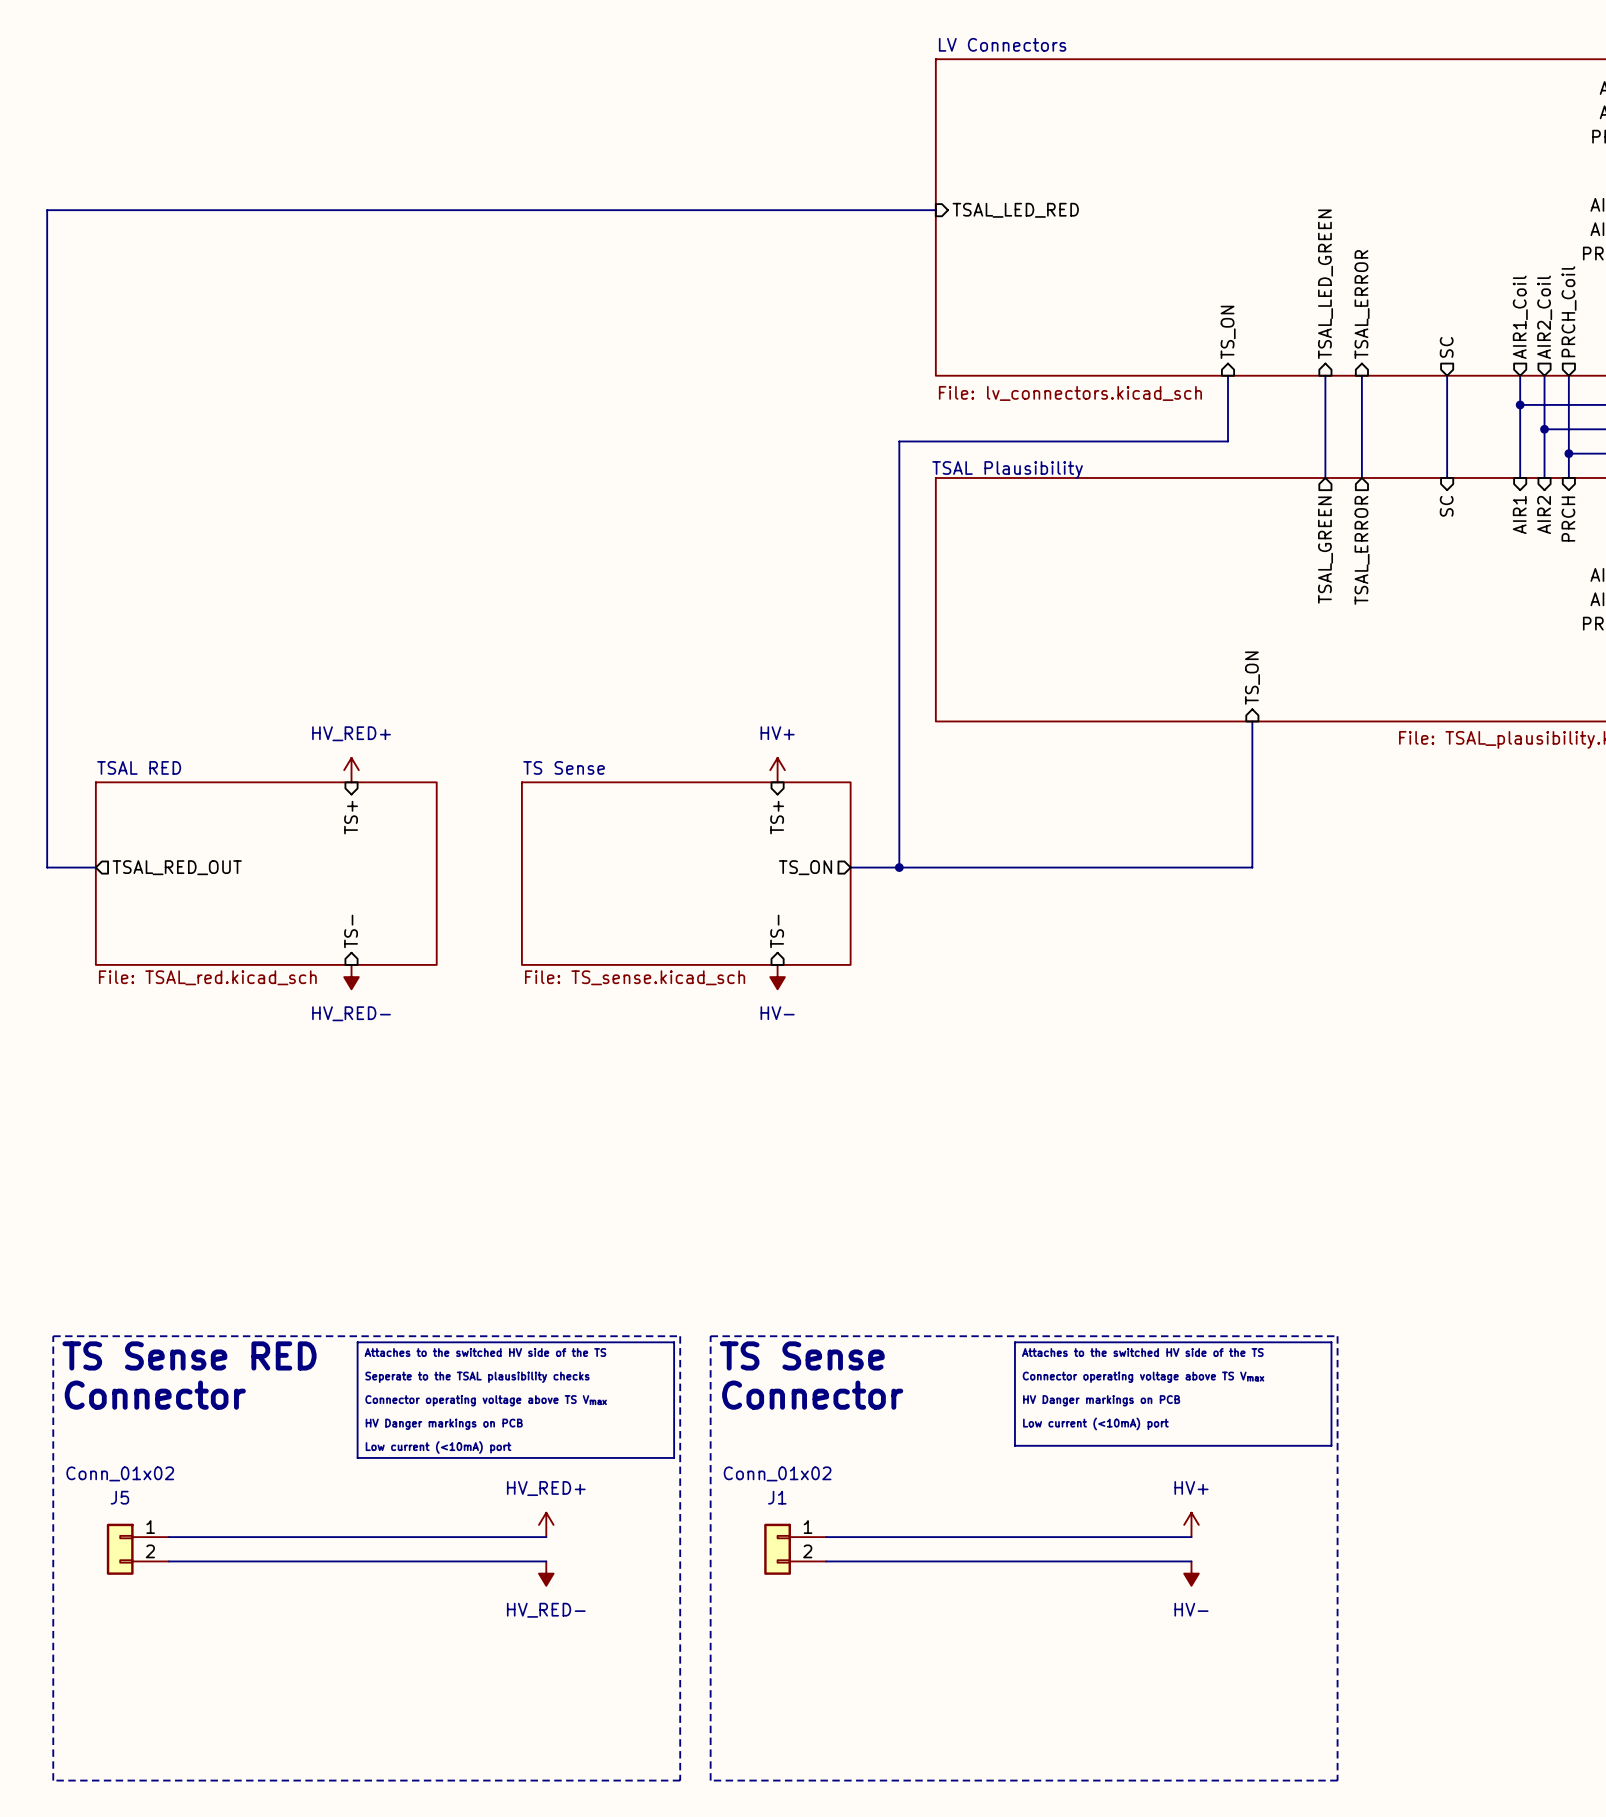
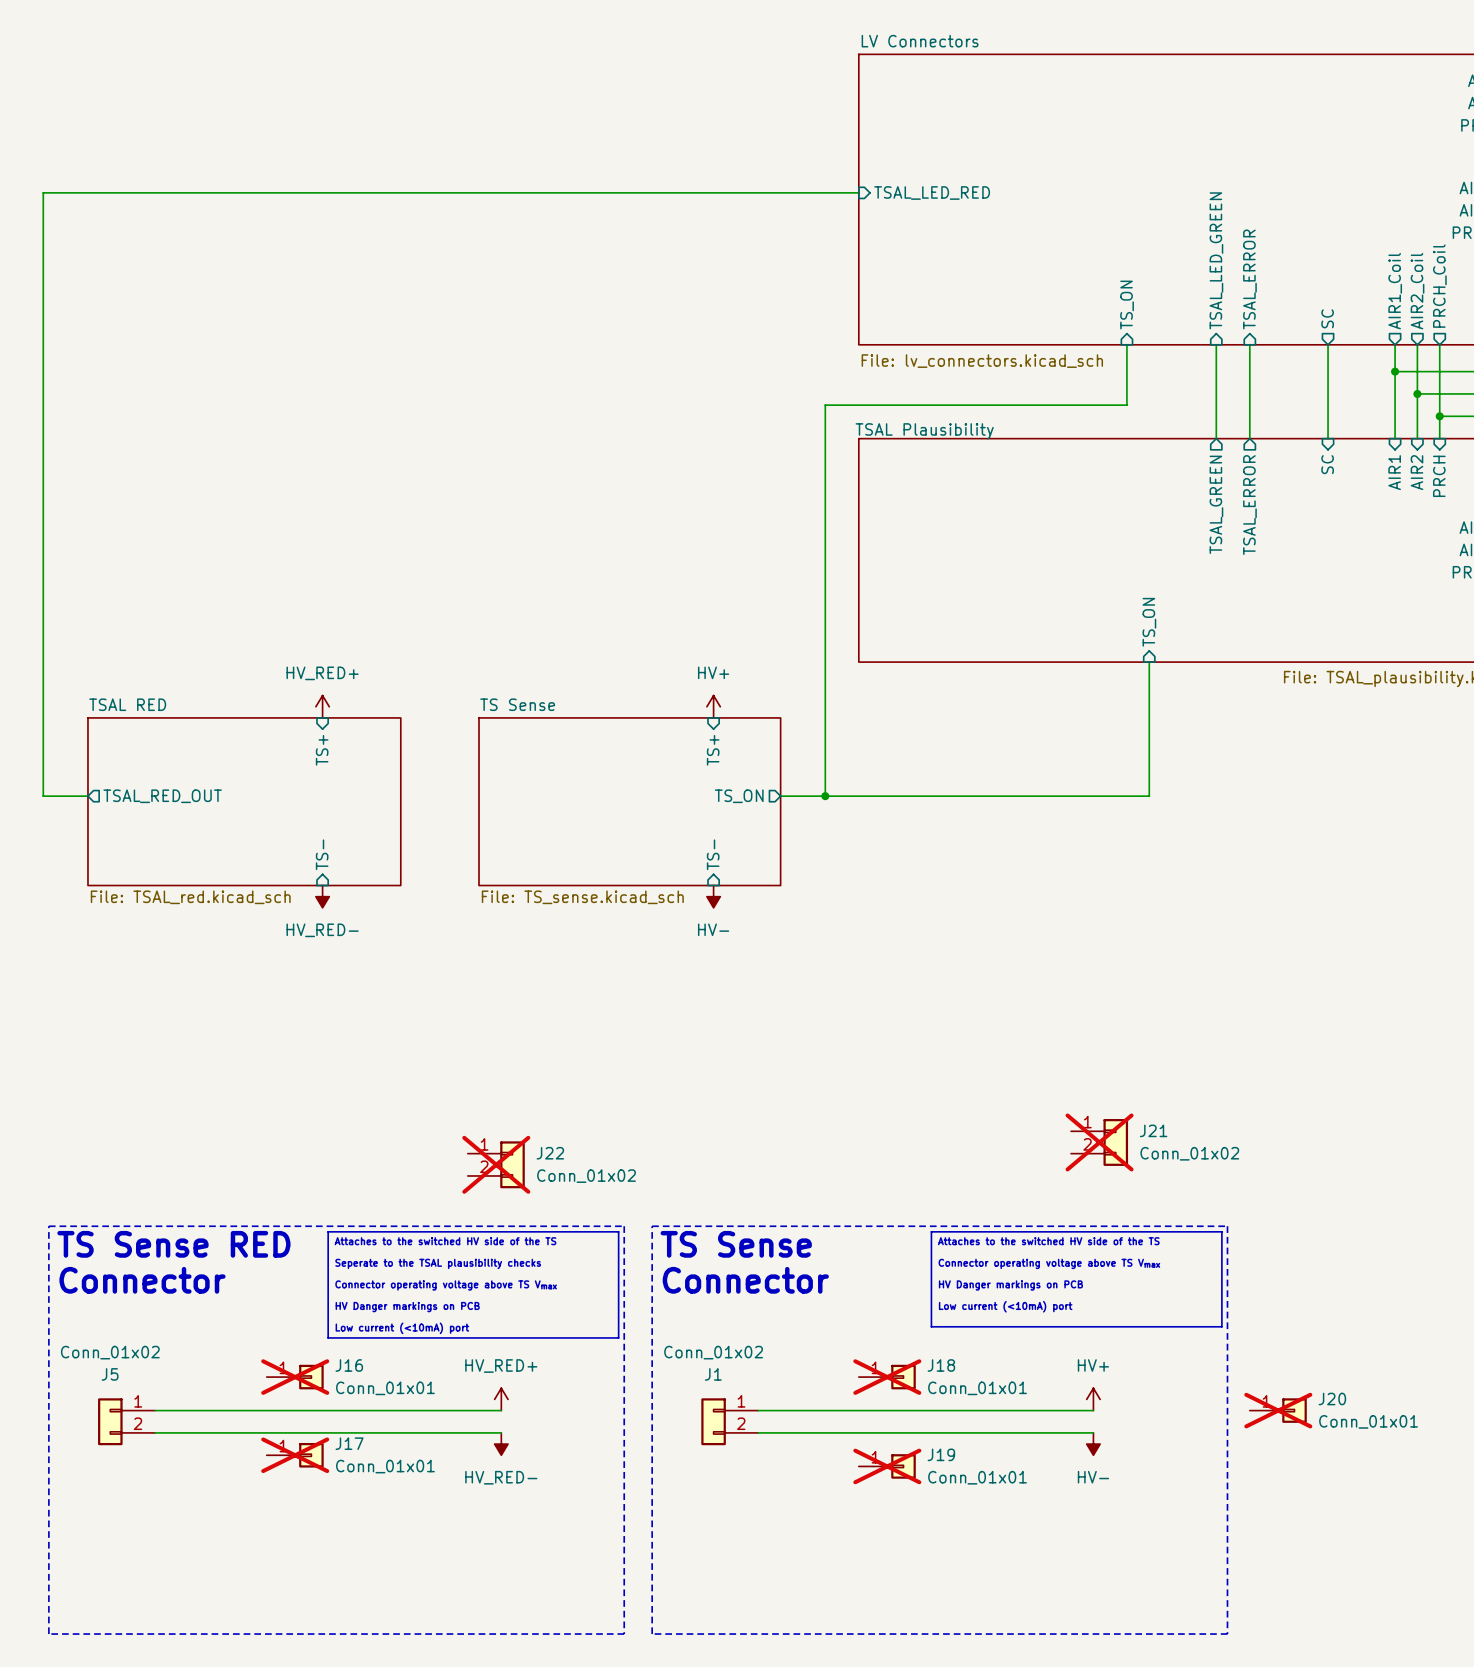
J21: none -> Conn_01x02 (1099, 1142)
J22: none -> Conn_01x02 (496, 1164)
J16: none -> Conn_01x01 (295, 1377)
J18: none -> Conn_01x01 (887, 1377)
J20: none -> Conn_01x01 (1278, 1410)
J17: none -> Conn_01x01 (295, 1455)
J19: none -> Conn_01x01 (887, 1466)

